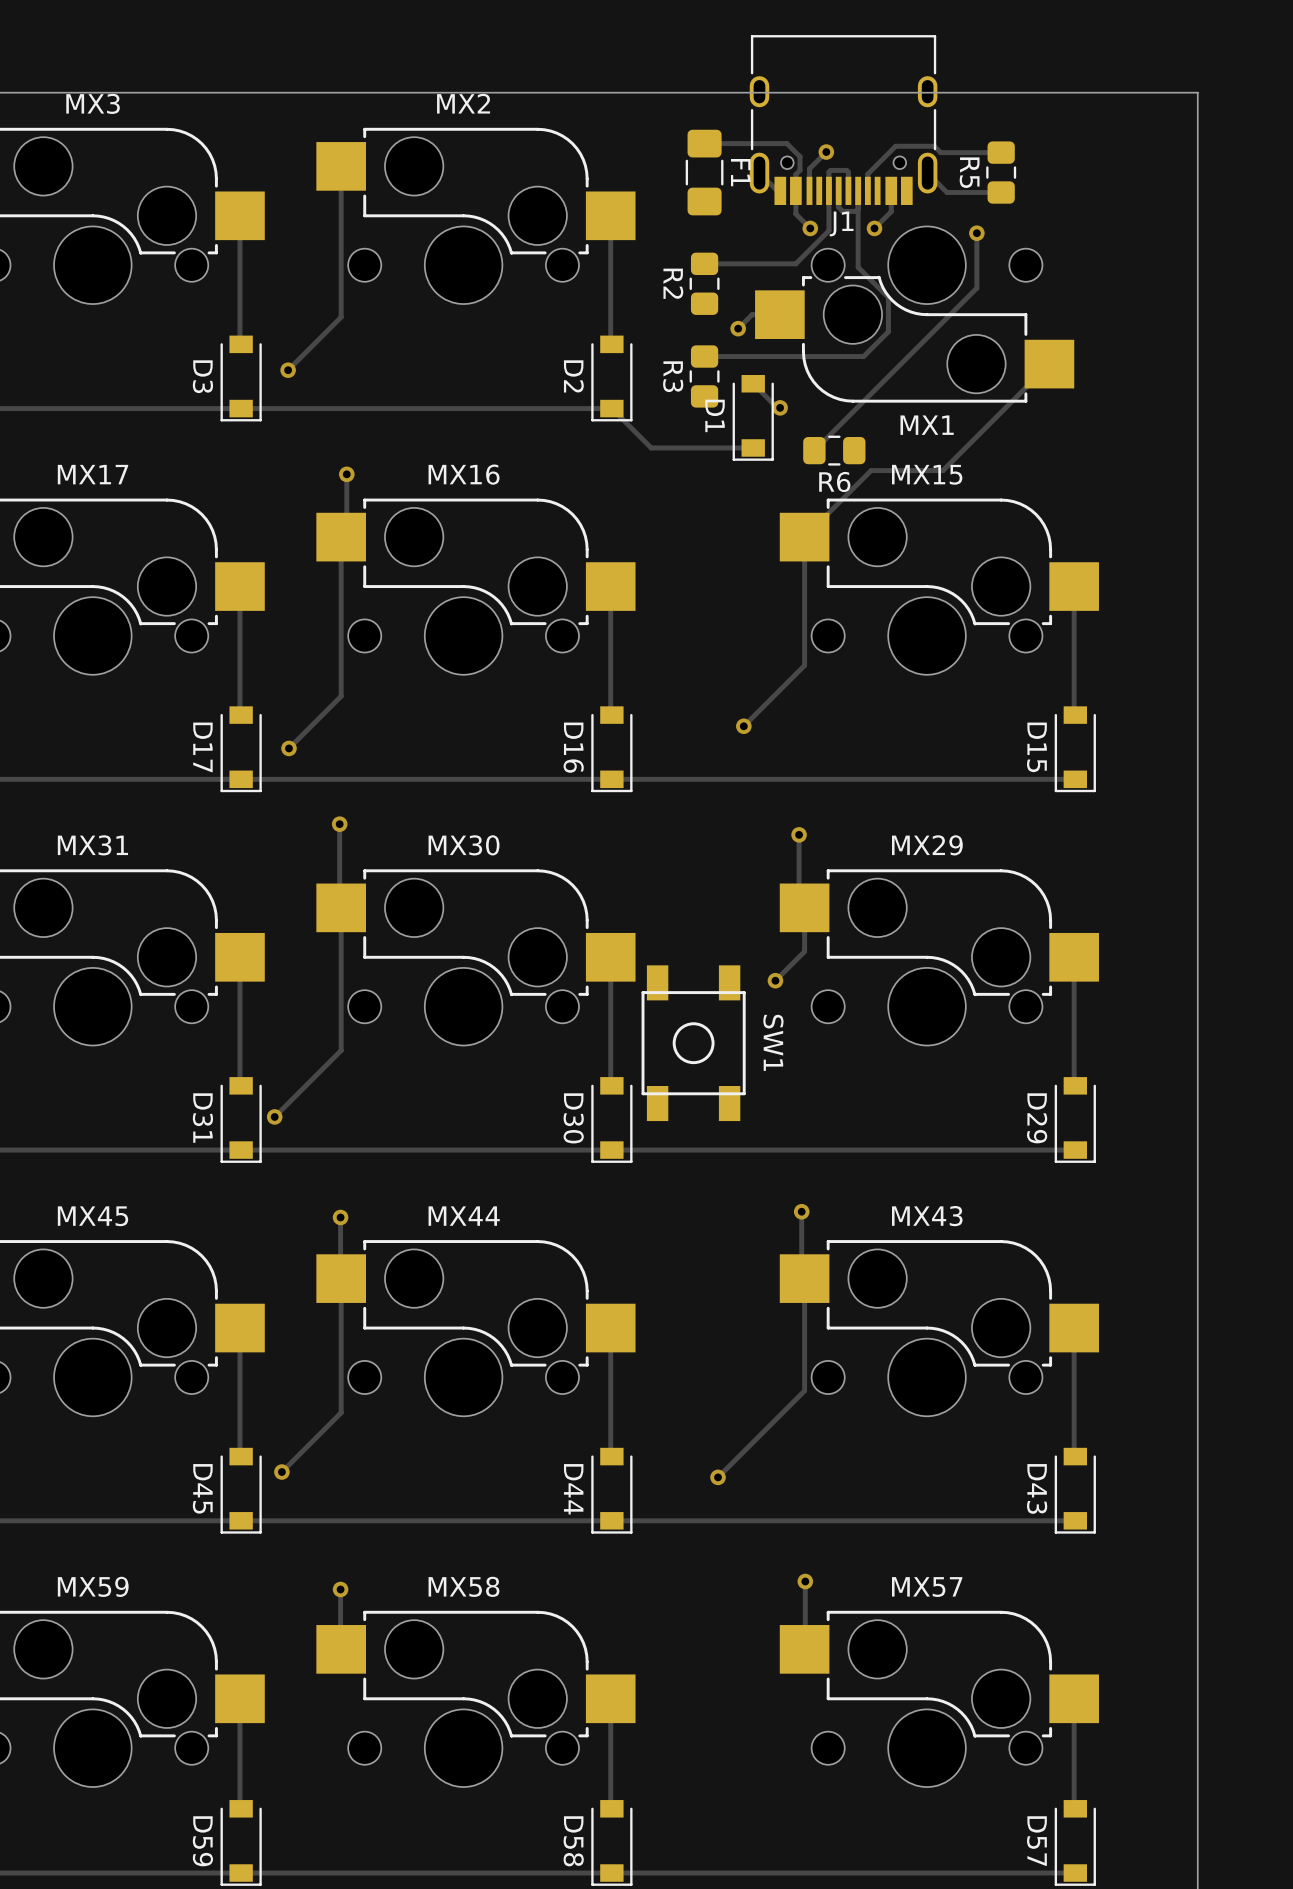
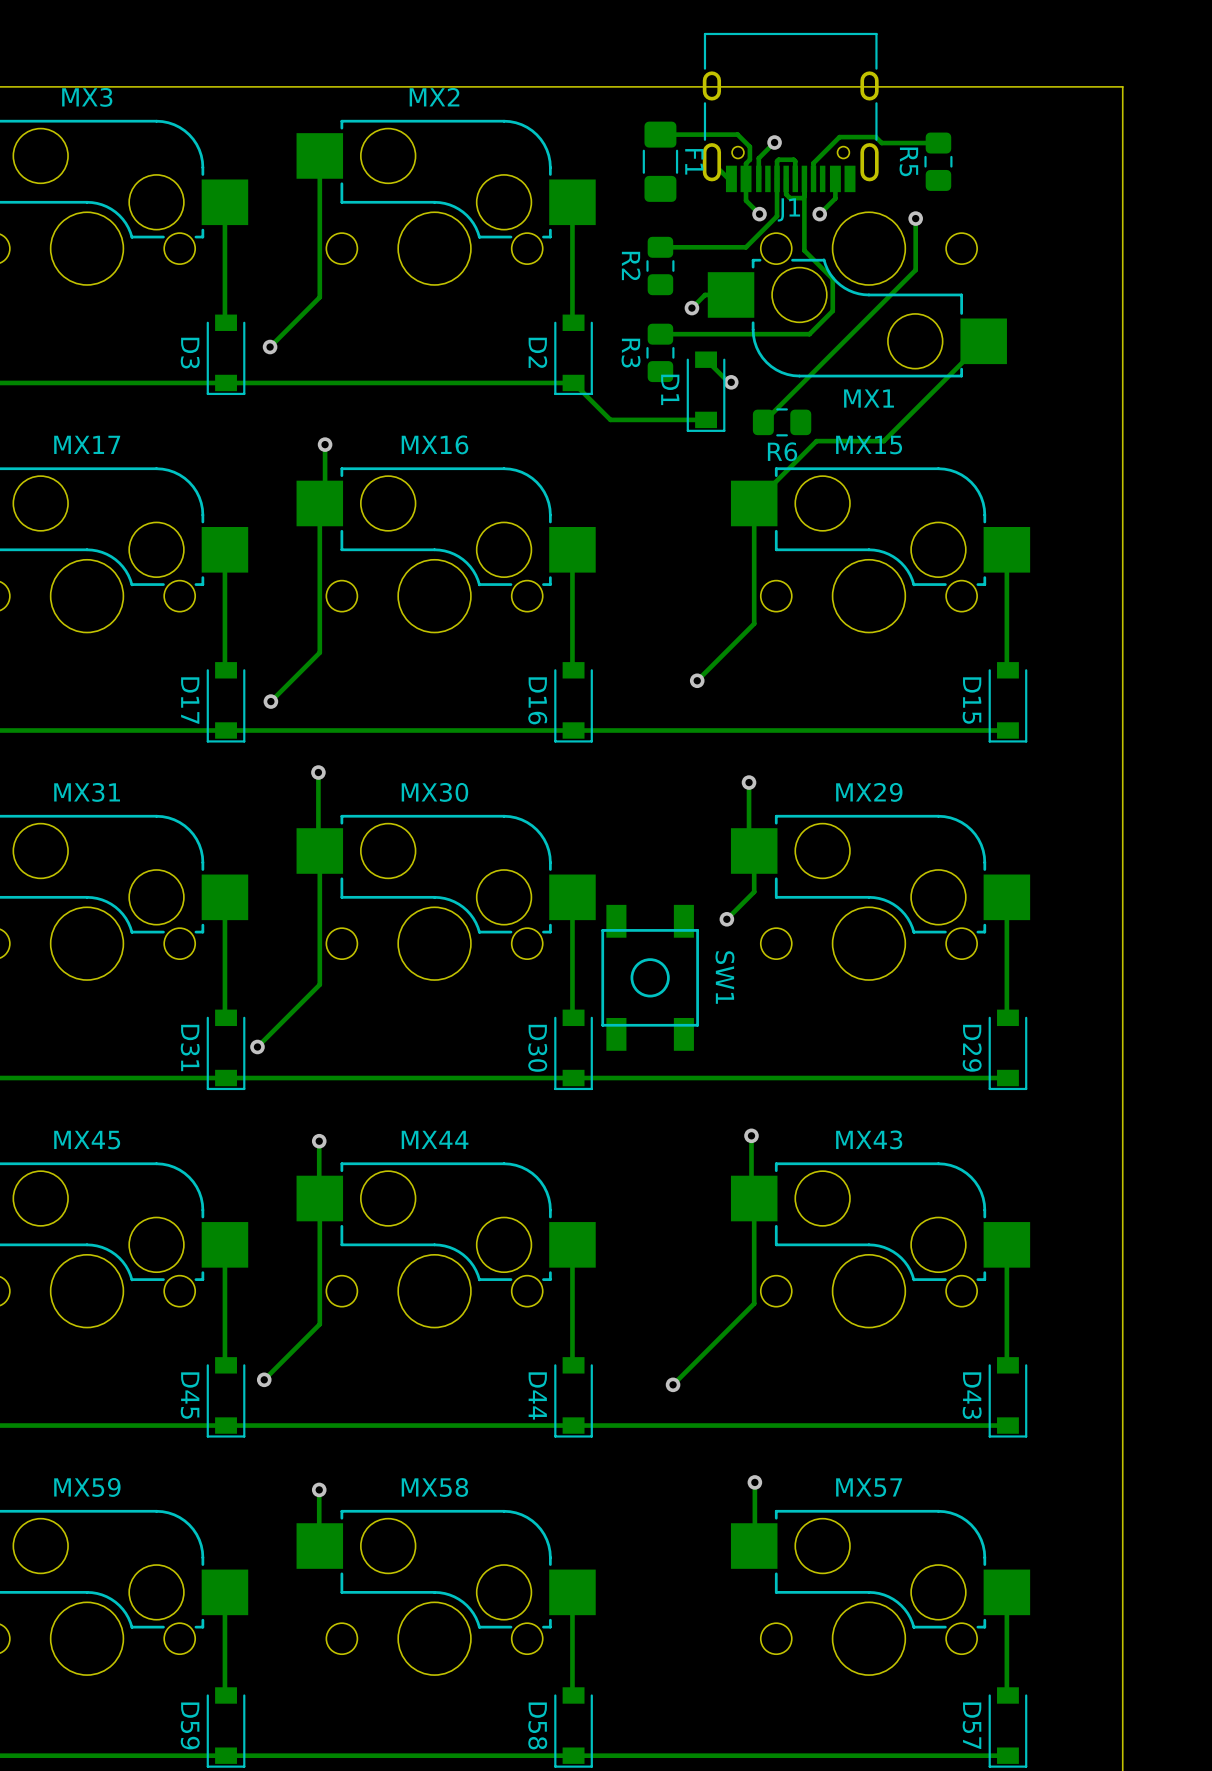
track: (927, 173) (947, 192) (1001, 192) -> none

